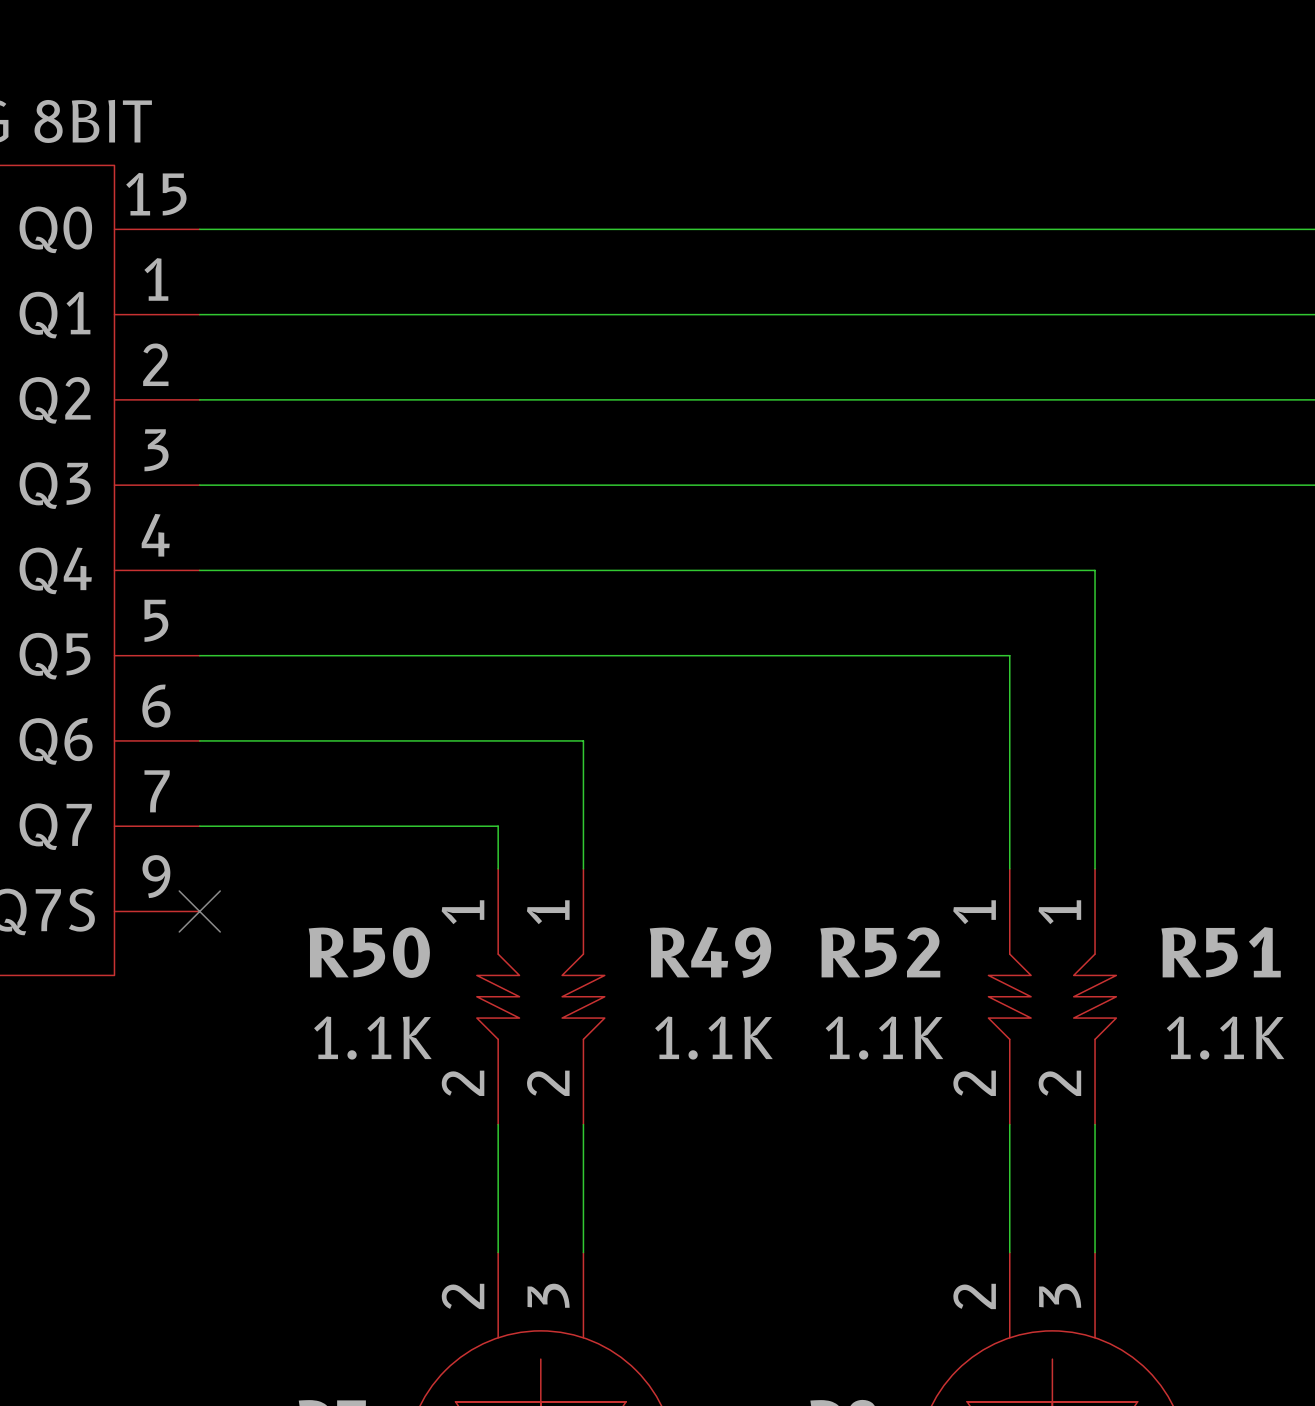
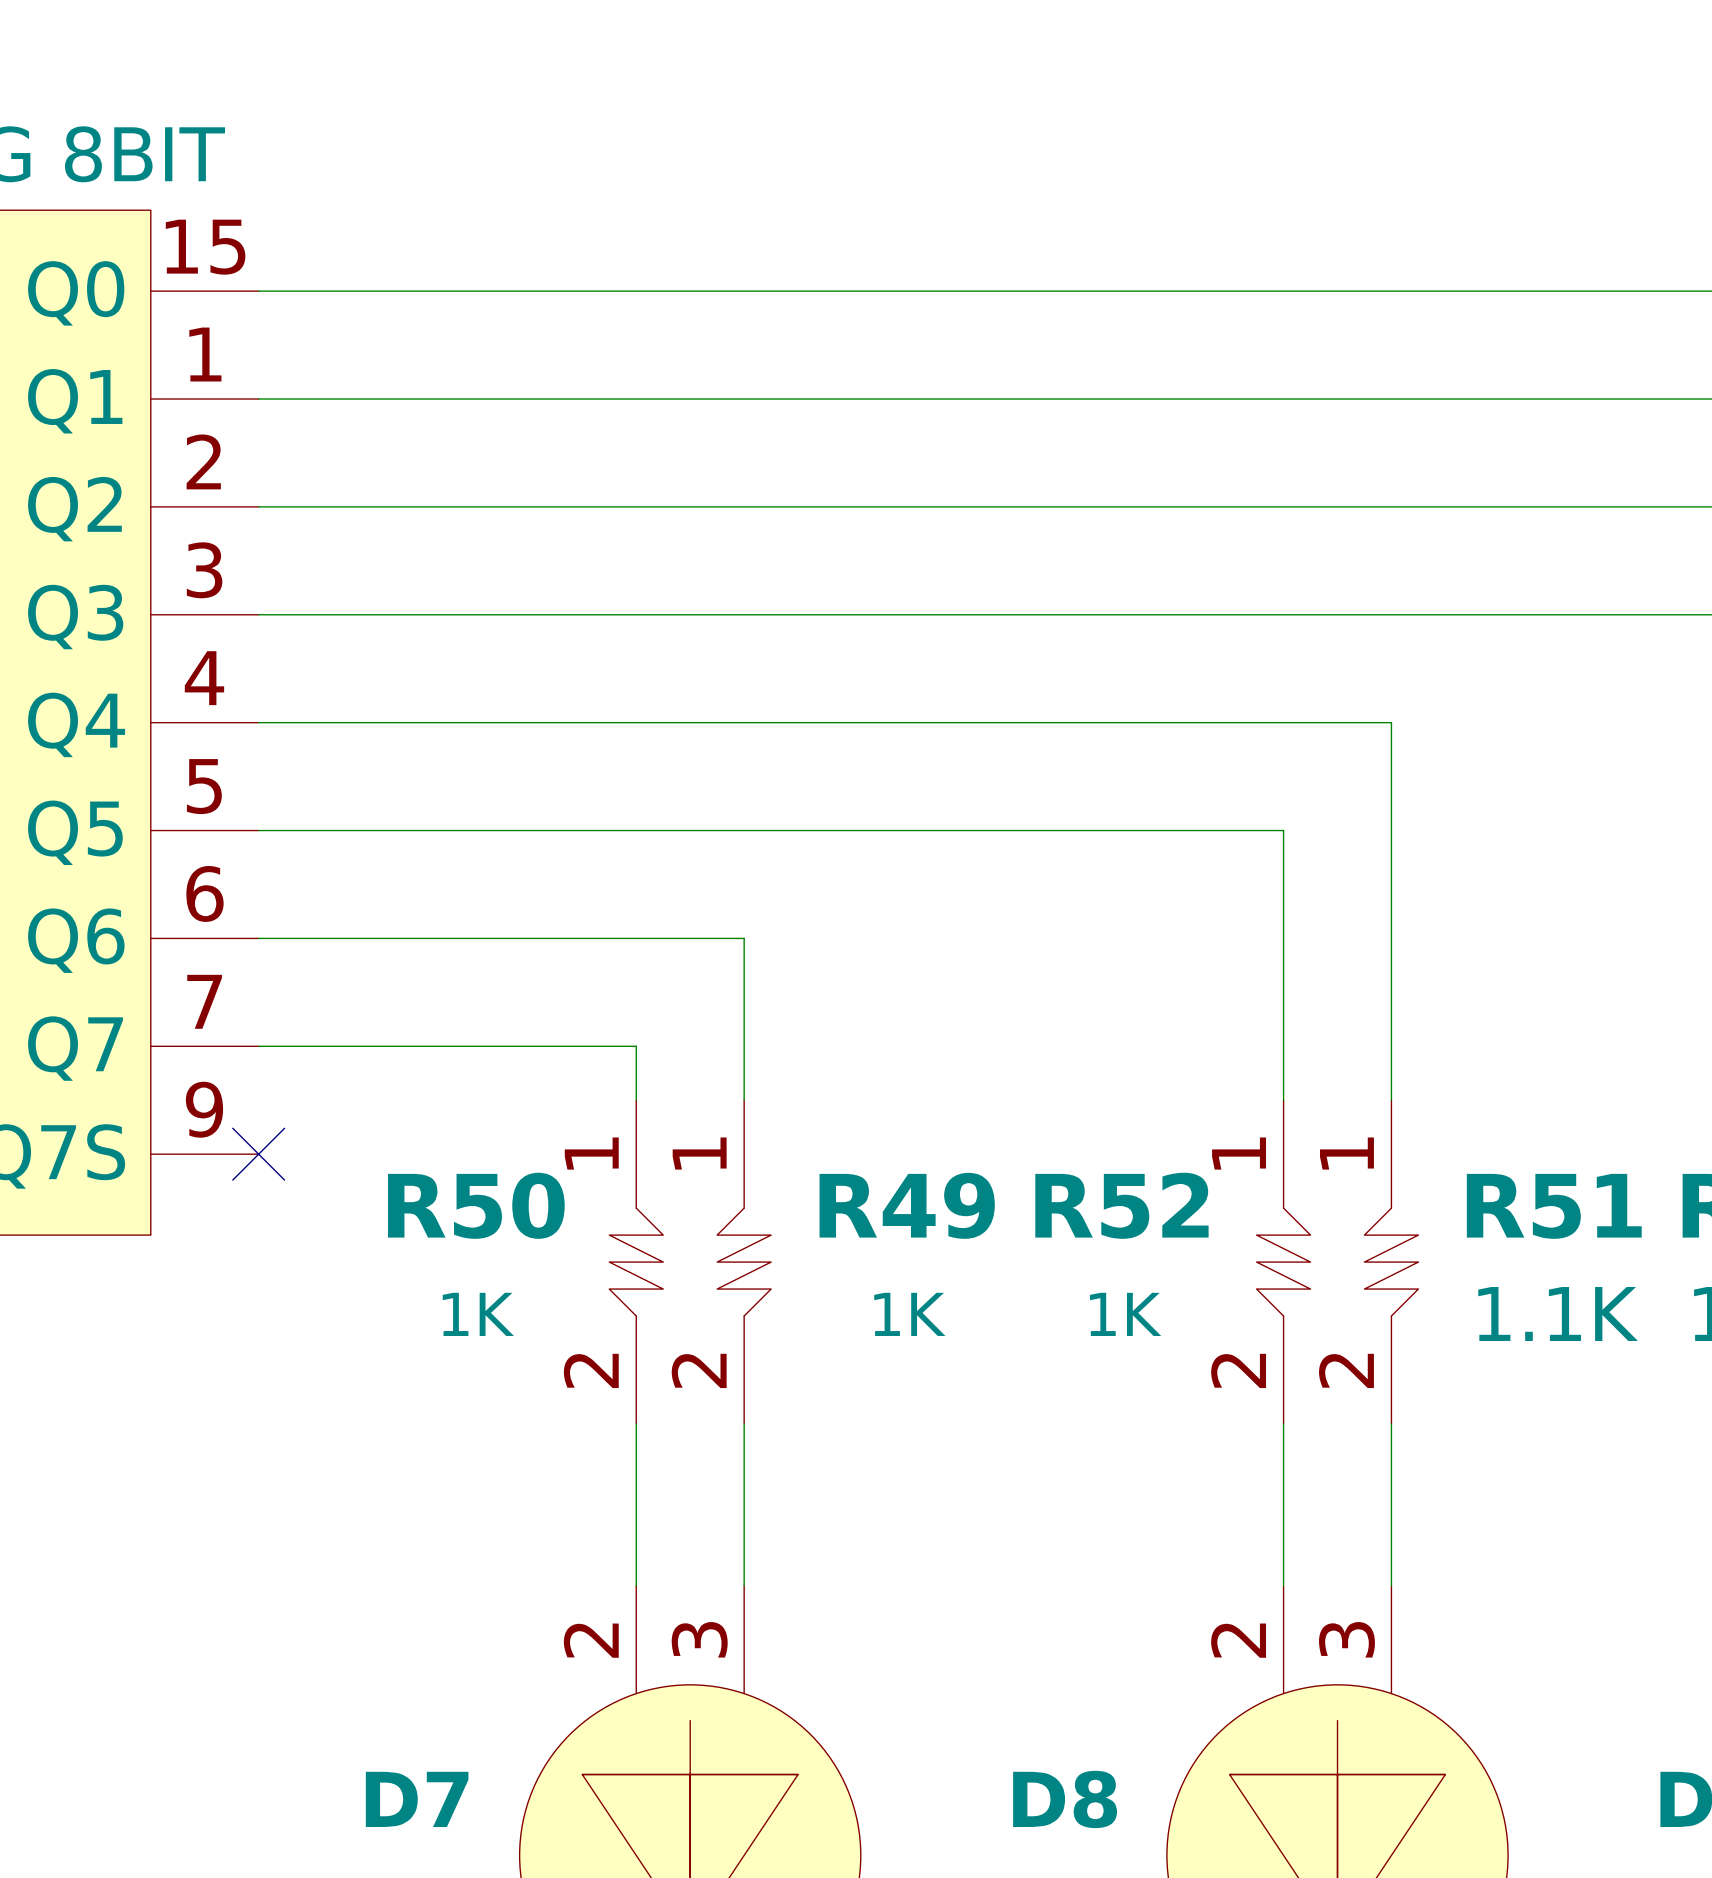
R50 value: 1.1K (372, 1038) -> 1K (478, 1314)
R49 value: 1.1K (713, 1038) -> 1K (909, 1314)
R52 value: 1.1K (884, 1038) -> 1K (1125, 1314)

